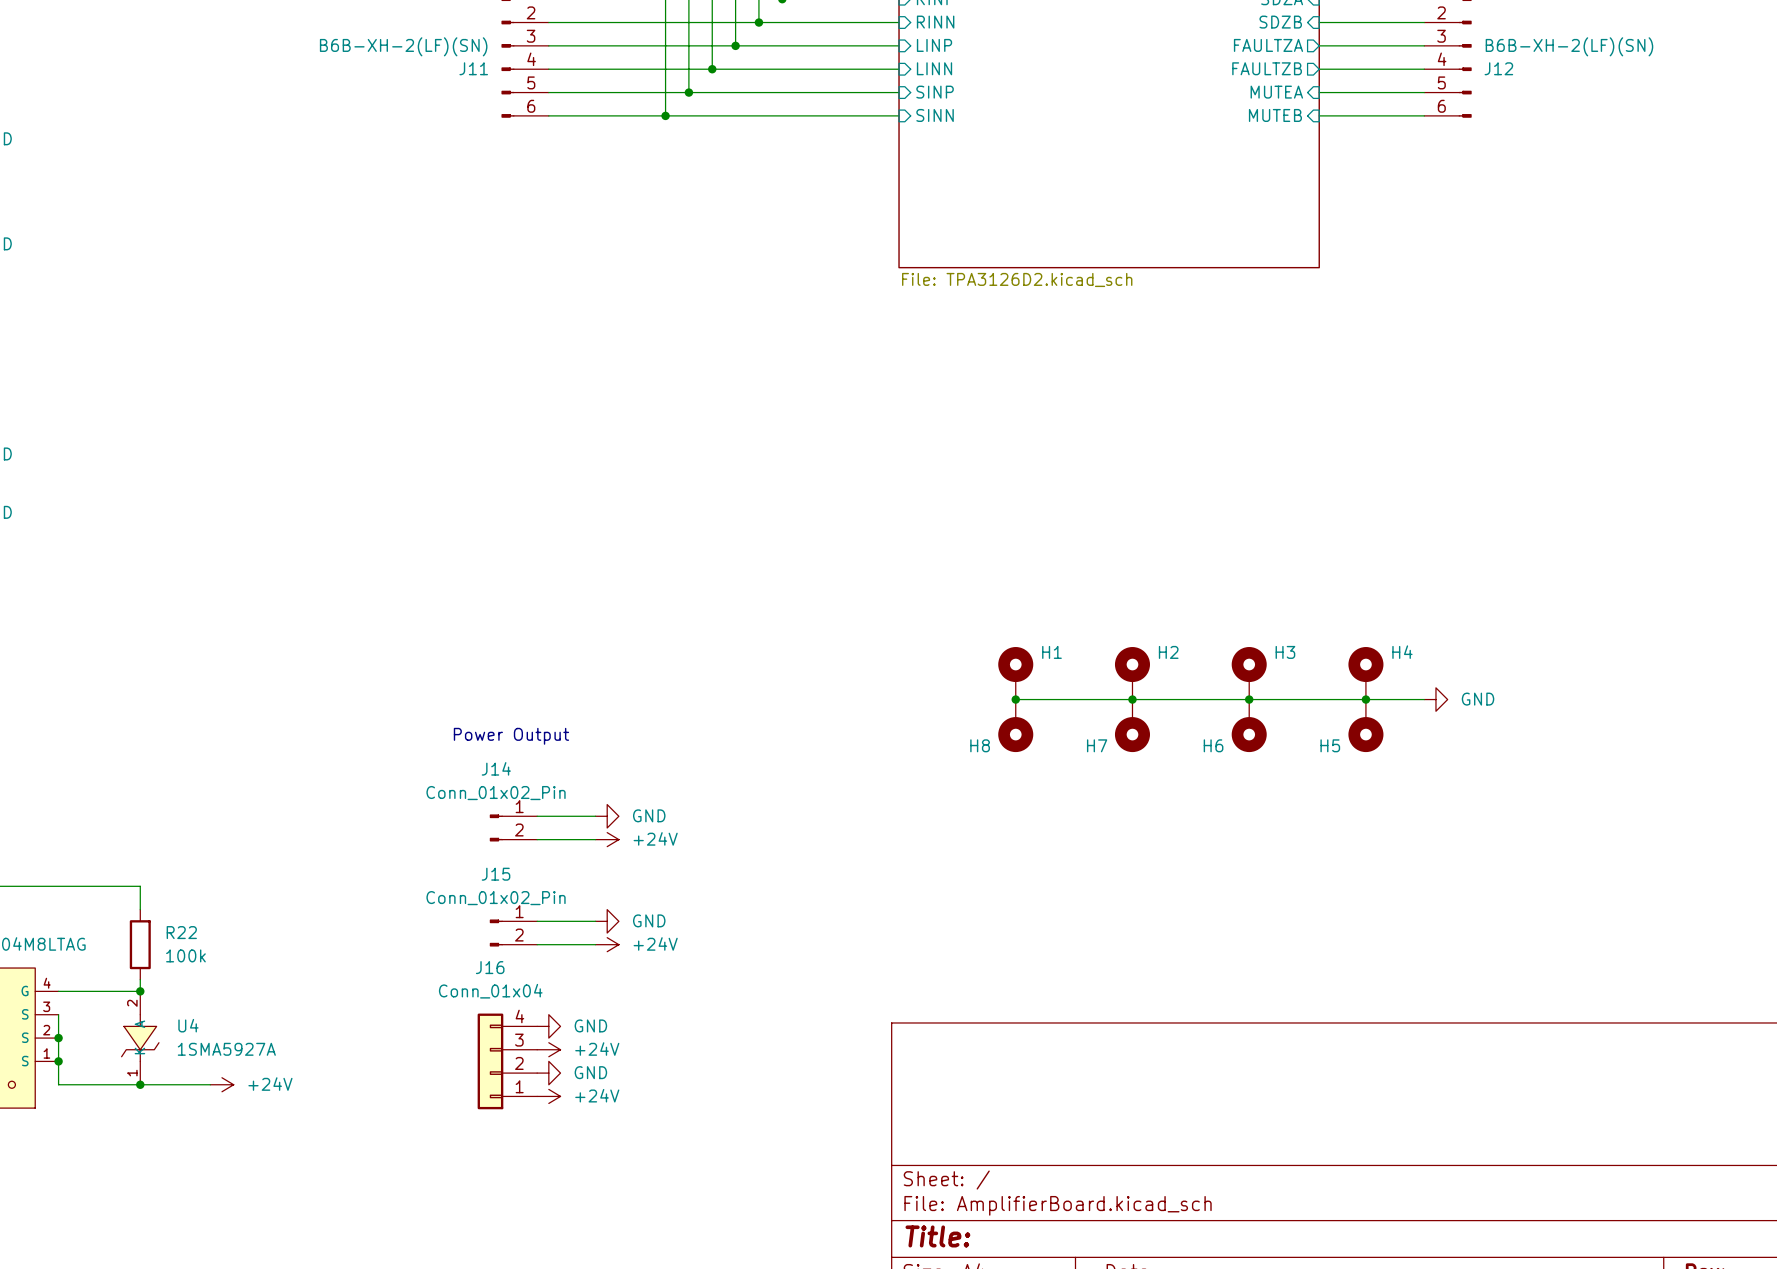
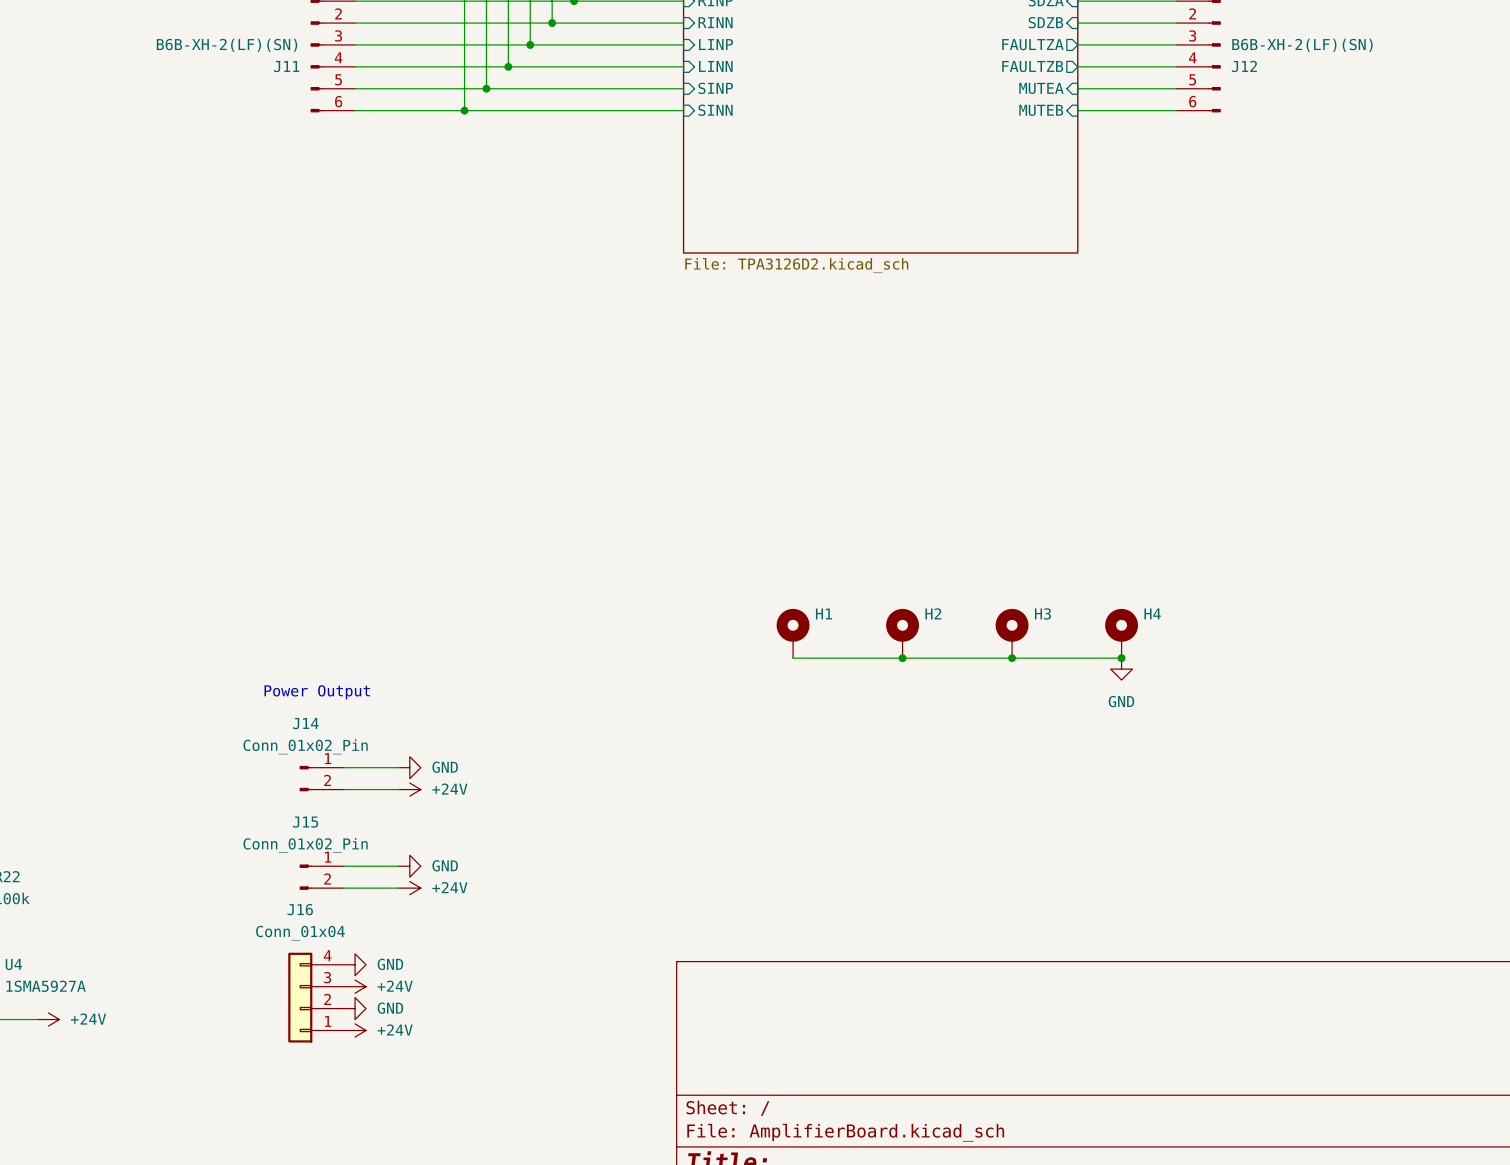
junction: (1015, 699) -> none
wire: (1365, 699) (1424, 699) -> none
power symbol rotation: 0° (1435, 699) -> 90° clockwise (1121, 669)
power symbol position: GND (1435, 699) -> GND (1121, 669)
H8: (1015, 725) -> none
H7: (1132, 725) -> none
H6: (1249, 725) -> none
H5: (1365, 725) -> none

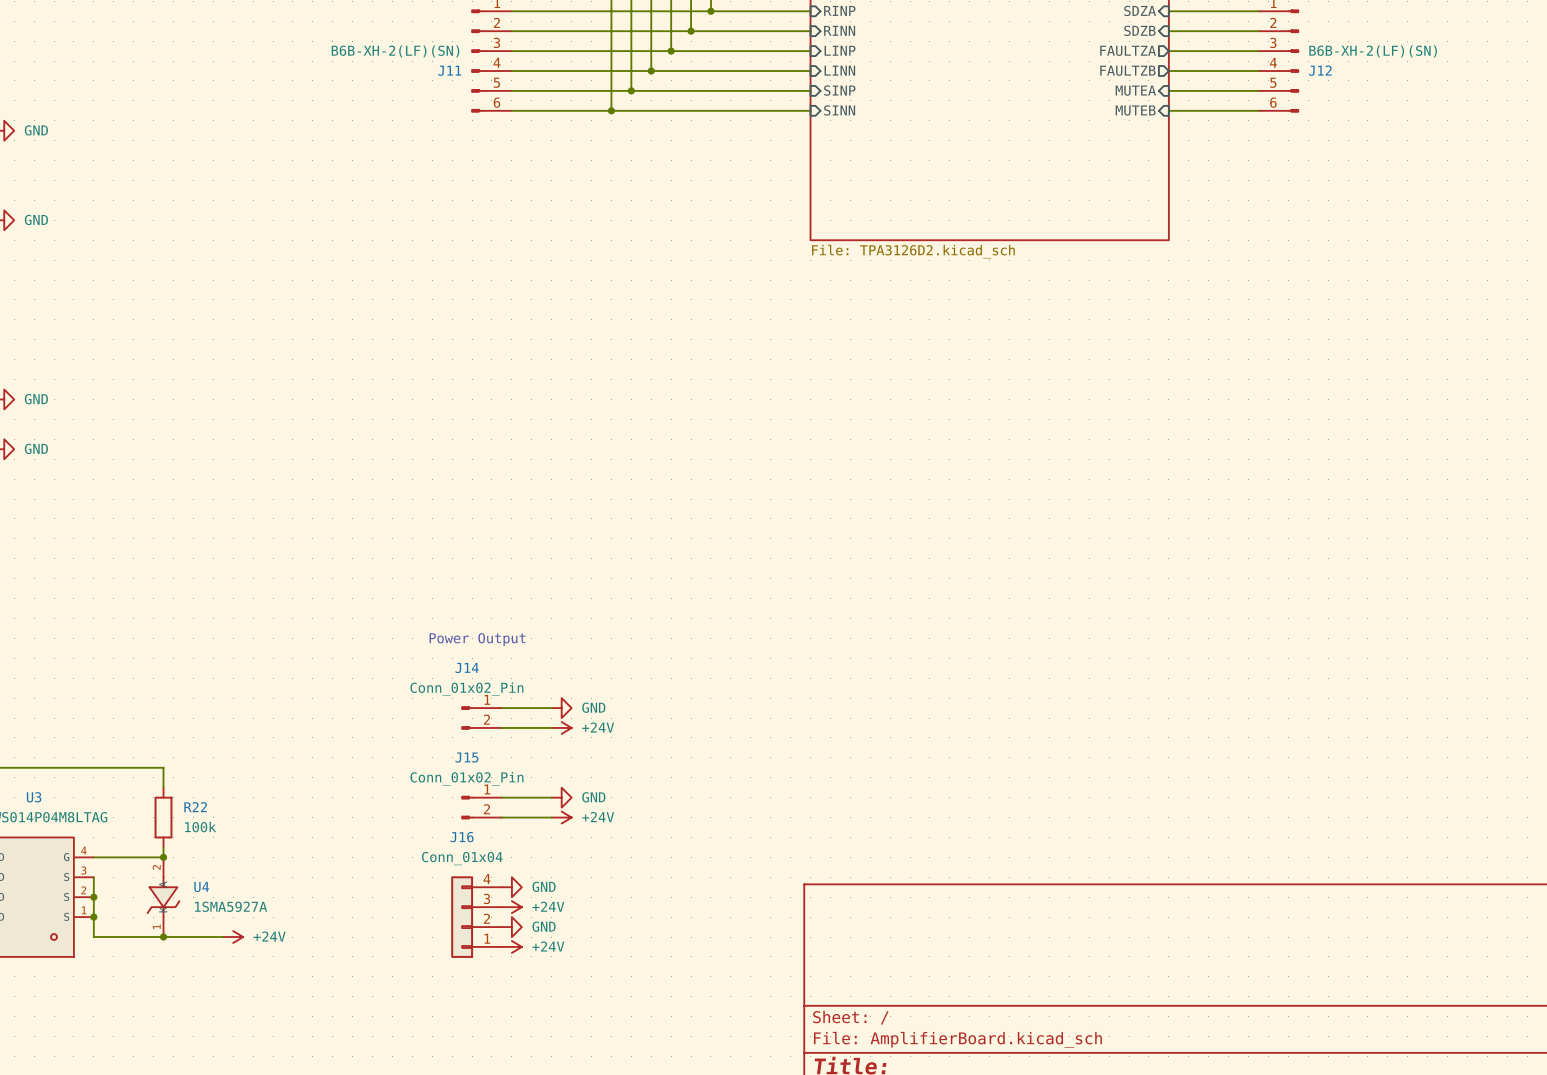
H1: (793, 633) -> none
H2: (902, 633) -> none
H3: (1012, 633) -> none
H4: (1121, 633) -> none
wire: (793, 658) (1121, 658) -> none
junction: (902, 658) -> none
junction: (1012, 658) -> none
junction: (1121, 658) -> none
power symbol: GND (1121, 669) -> none

